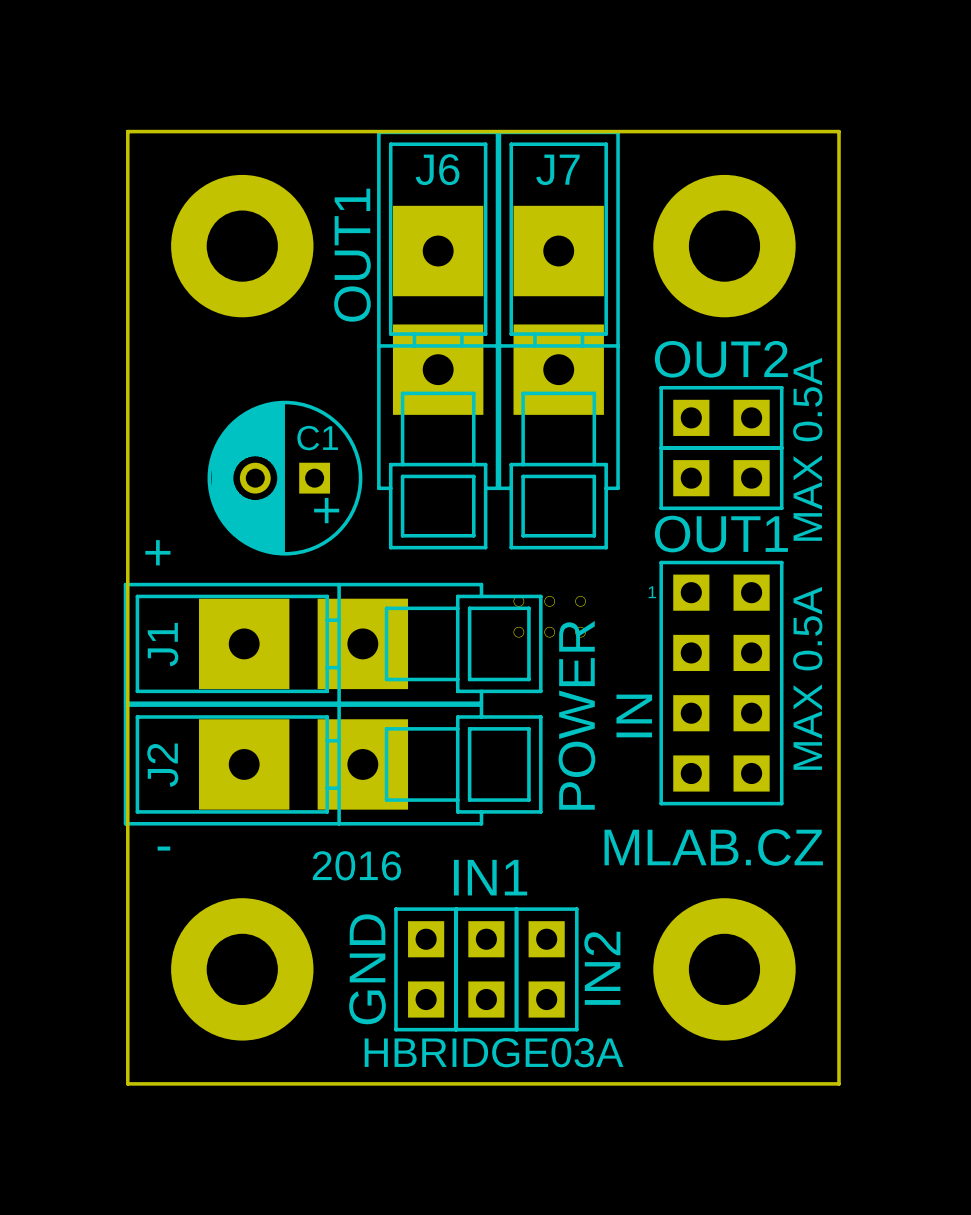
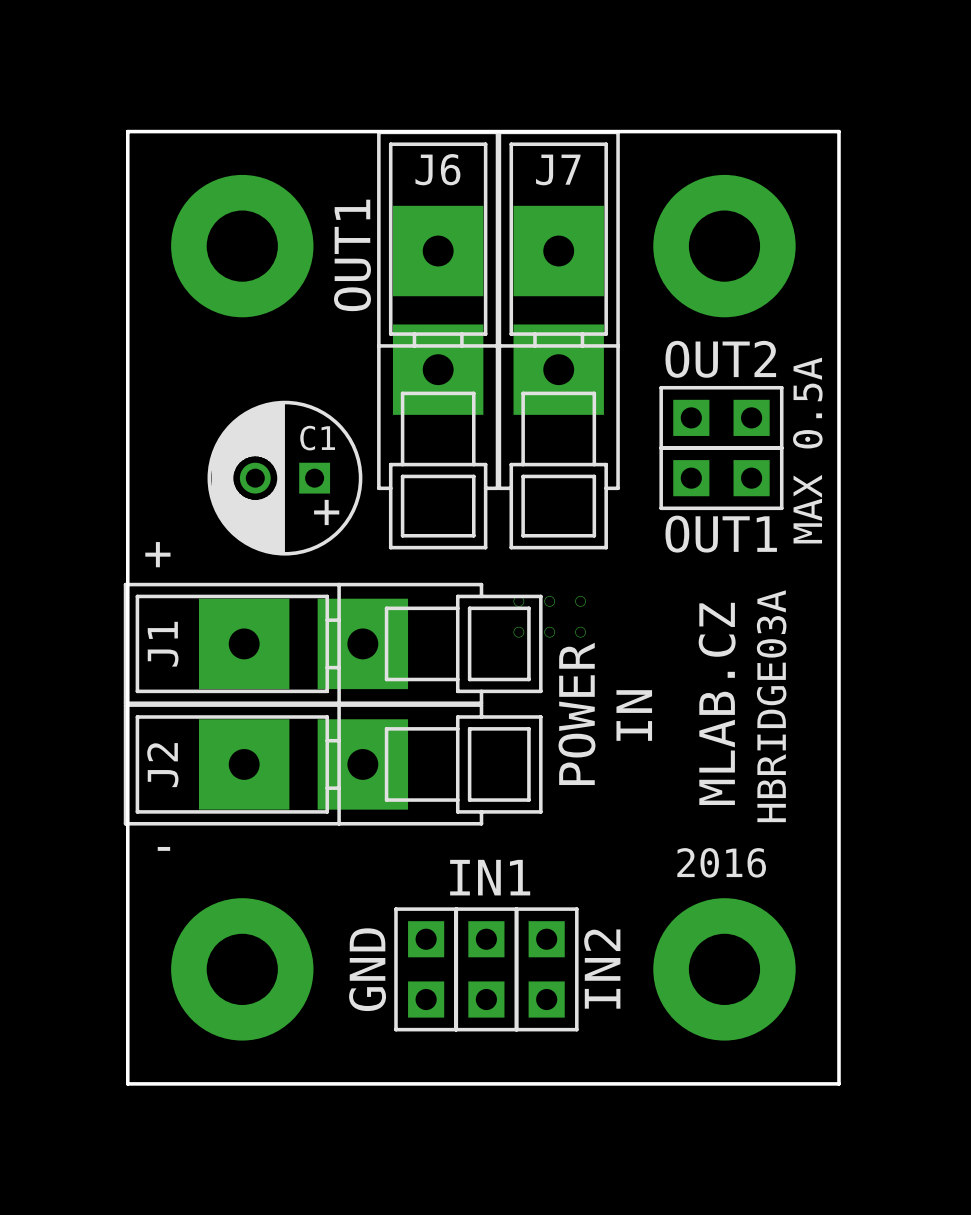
text: MAX 0.5A (807, 678) -> none
part: (721, 683) -> none
text: none -> MLAB.CZ (717, 703)
text: MLAB.CZ (713, 847) -> 2016 (721, 862)
text: 2016 (356, 865) -> none
text rotation: 0° (494, 1052) -> 90° counterclockwise (771, 706)
text position: HBRIDGE03A (494, 1052) -> HBRIDGE03A (771, 706)

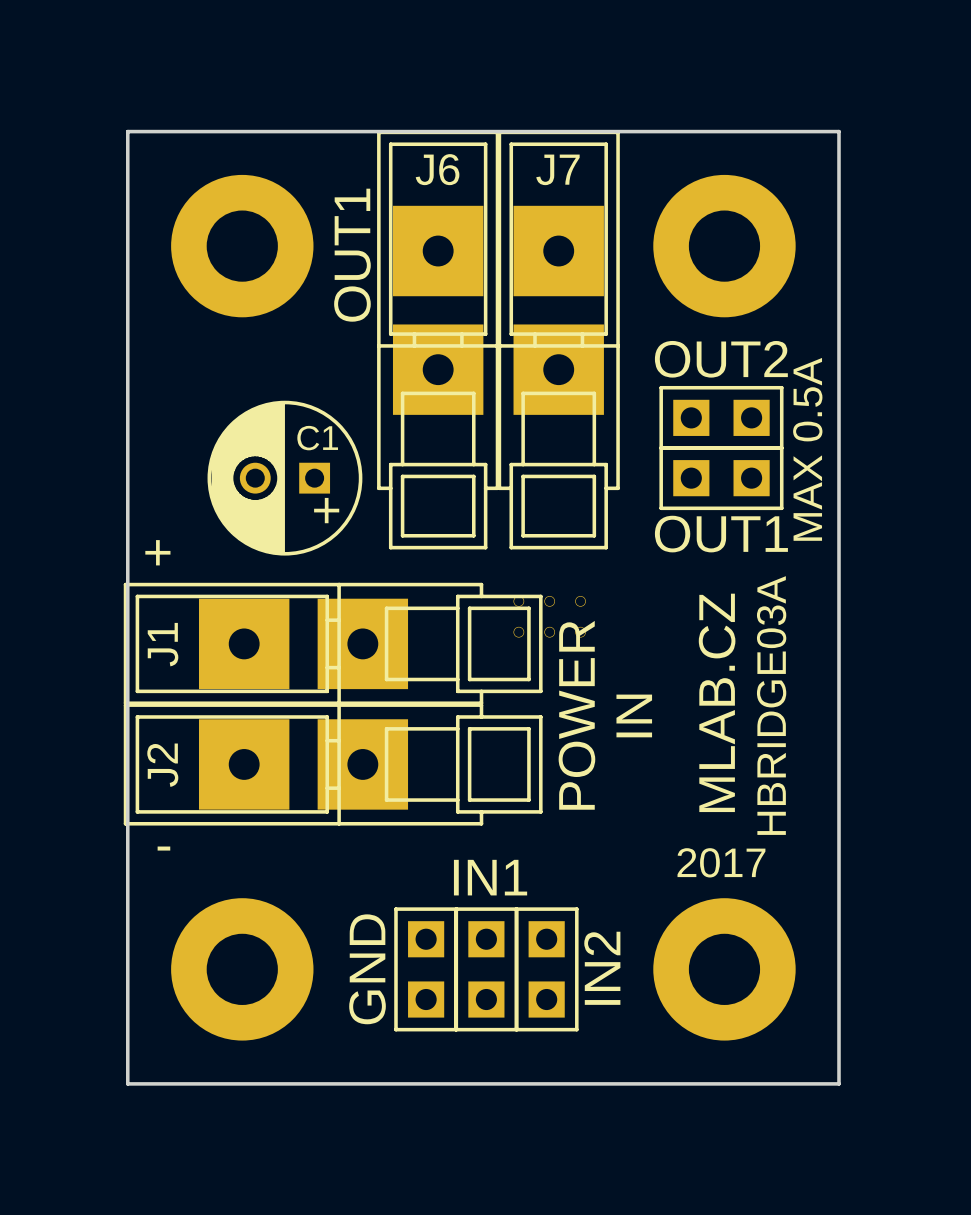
text: 2016 (721, 862) -> 2017 (721, 862)

